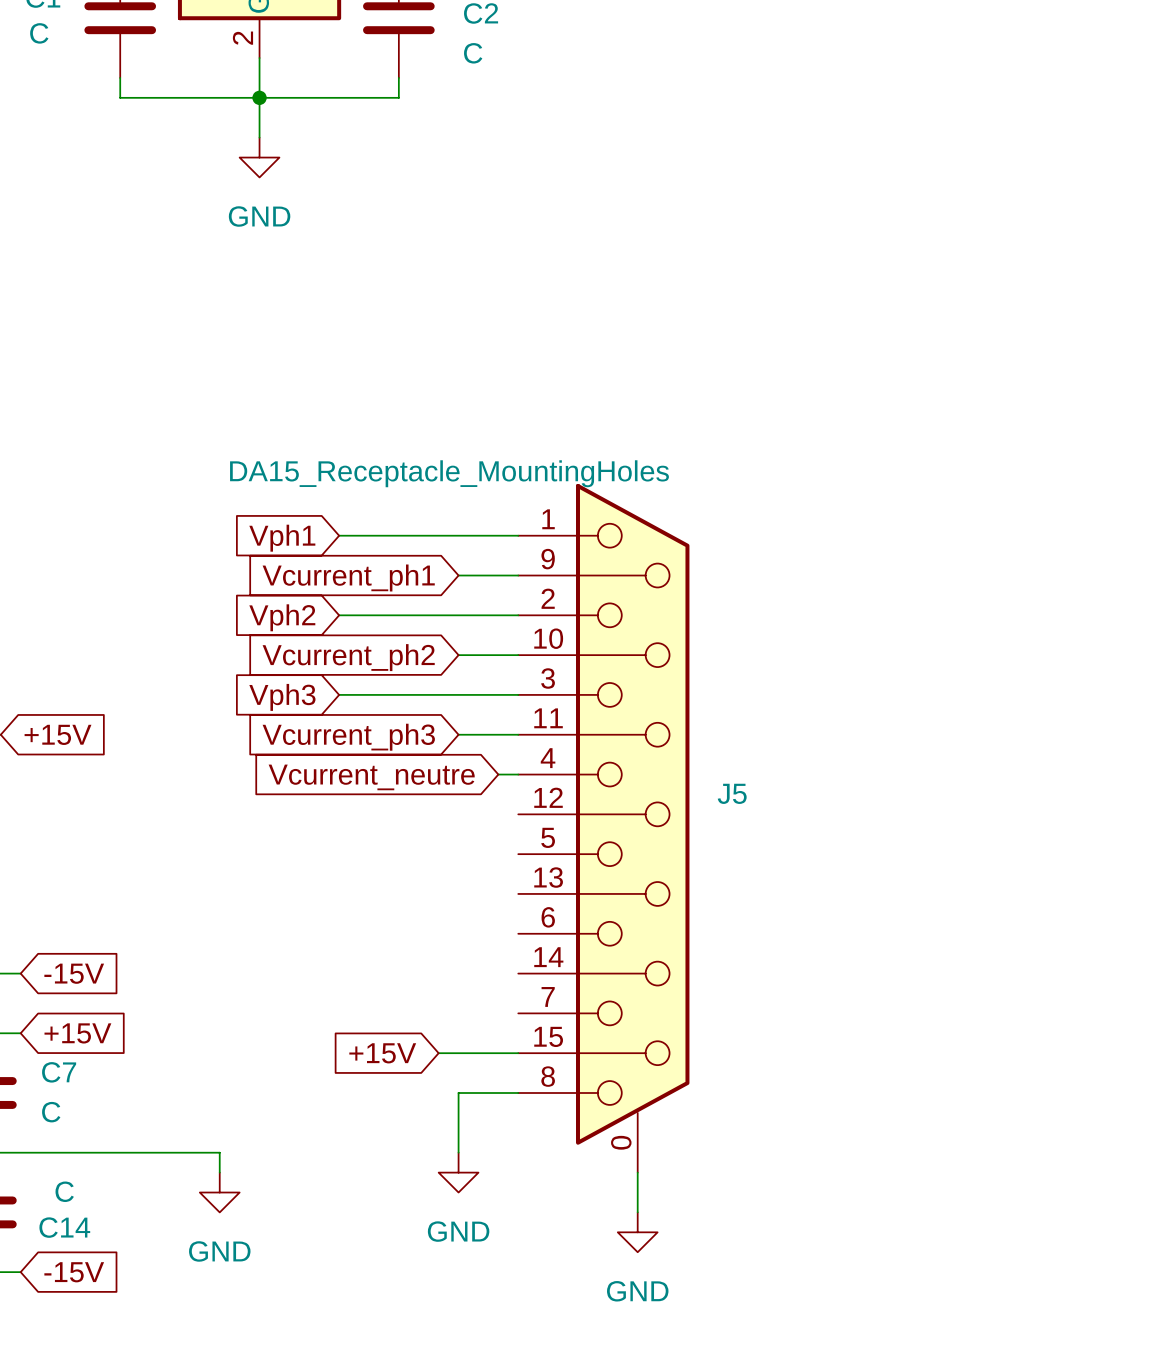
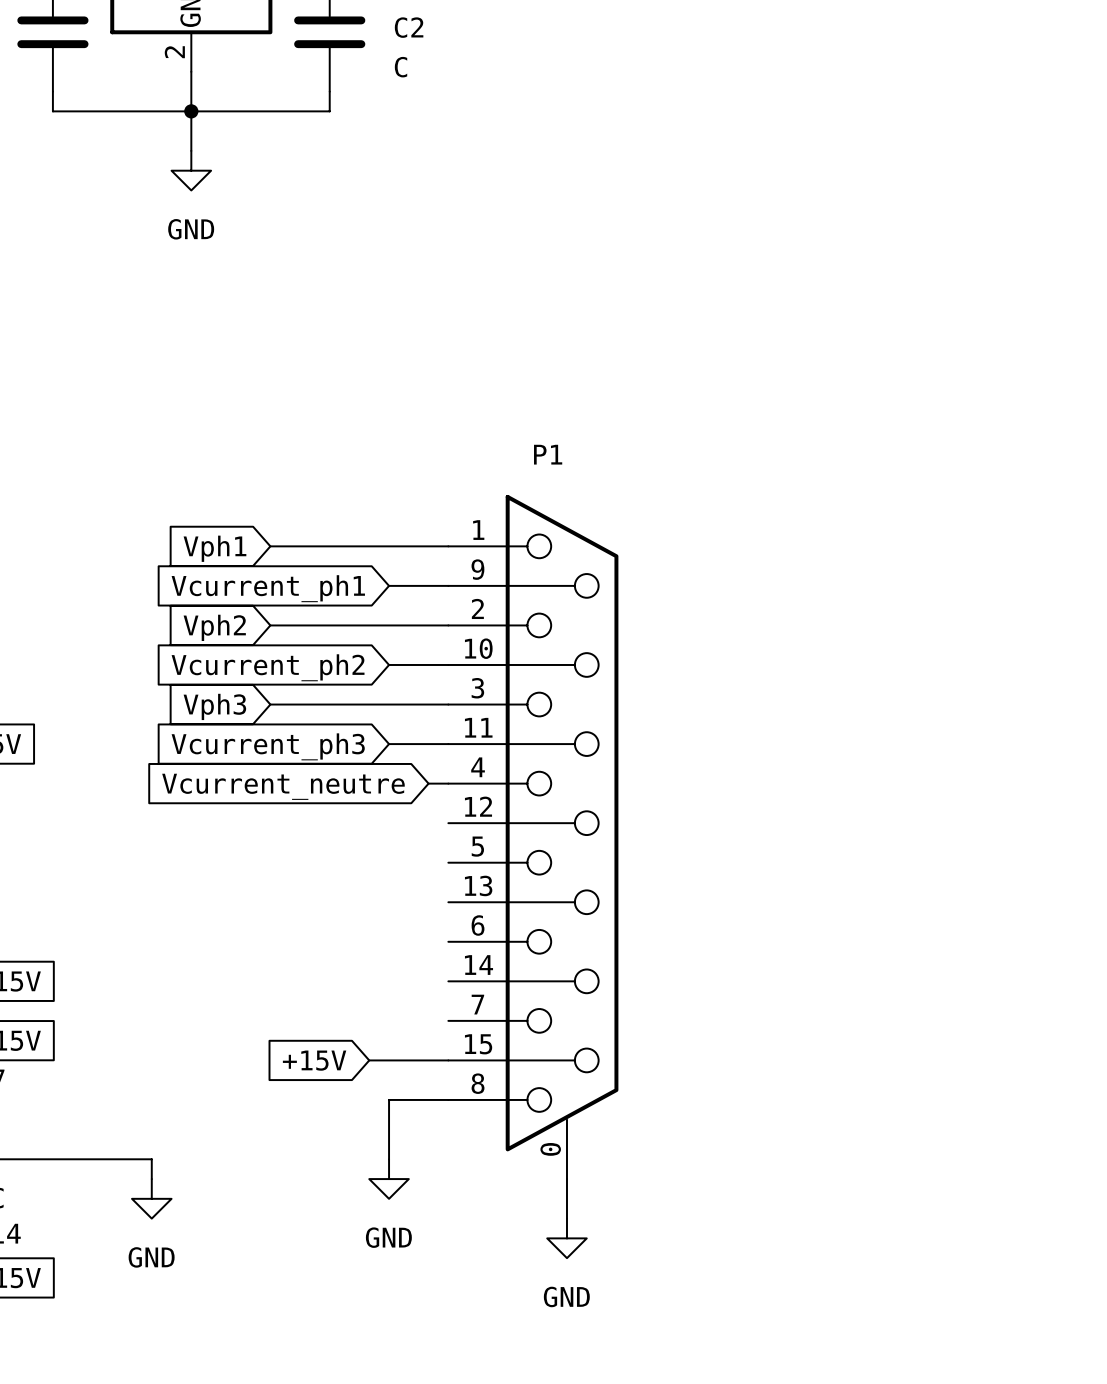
J5 value: DA15_Receptacle_MountingHoles (449, 473) -> none
J5 name: J5 (732, 793) -> P1 (548, 454)

